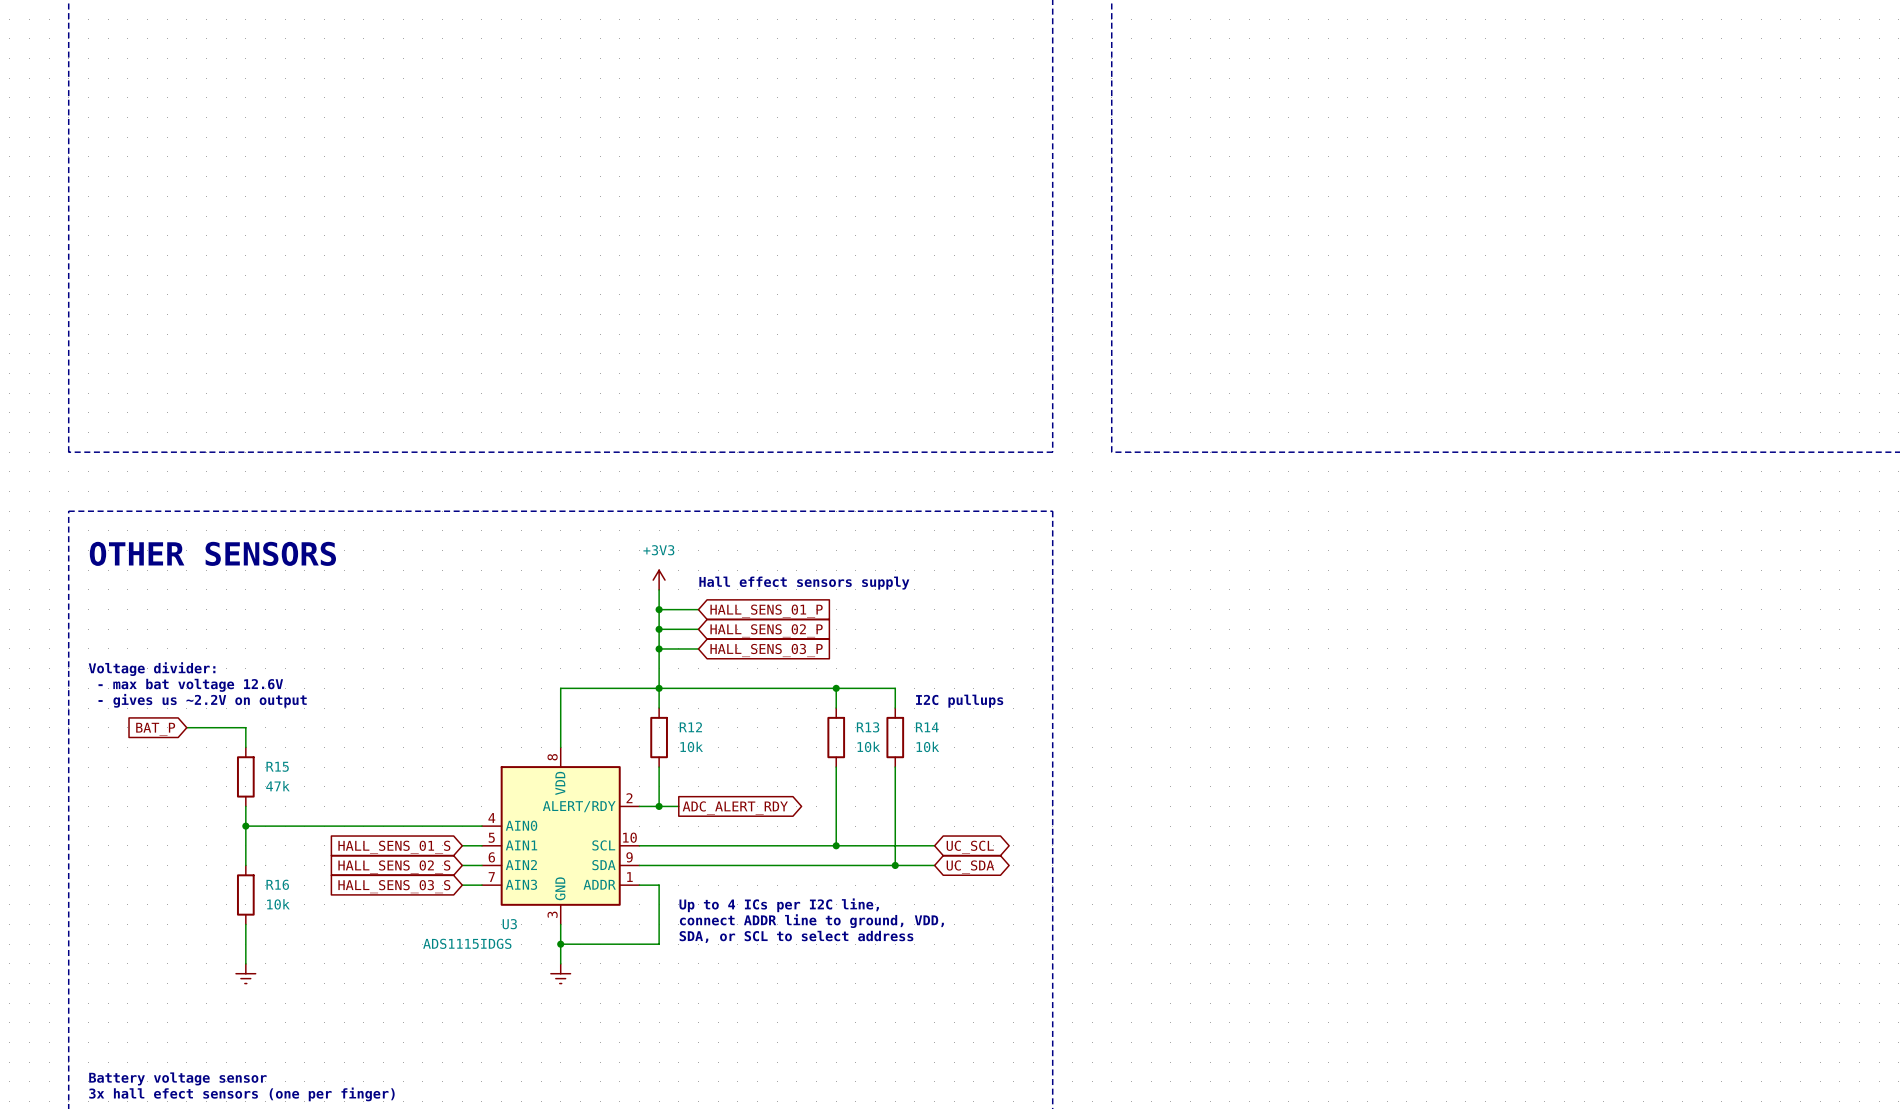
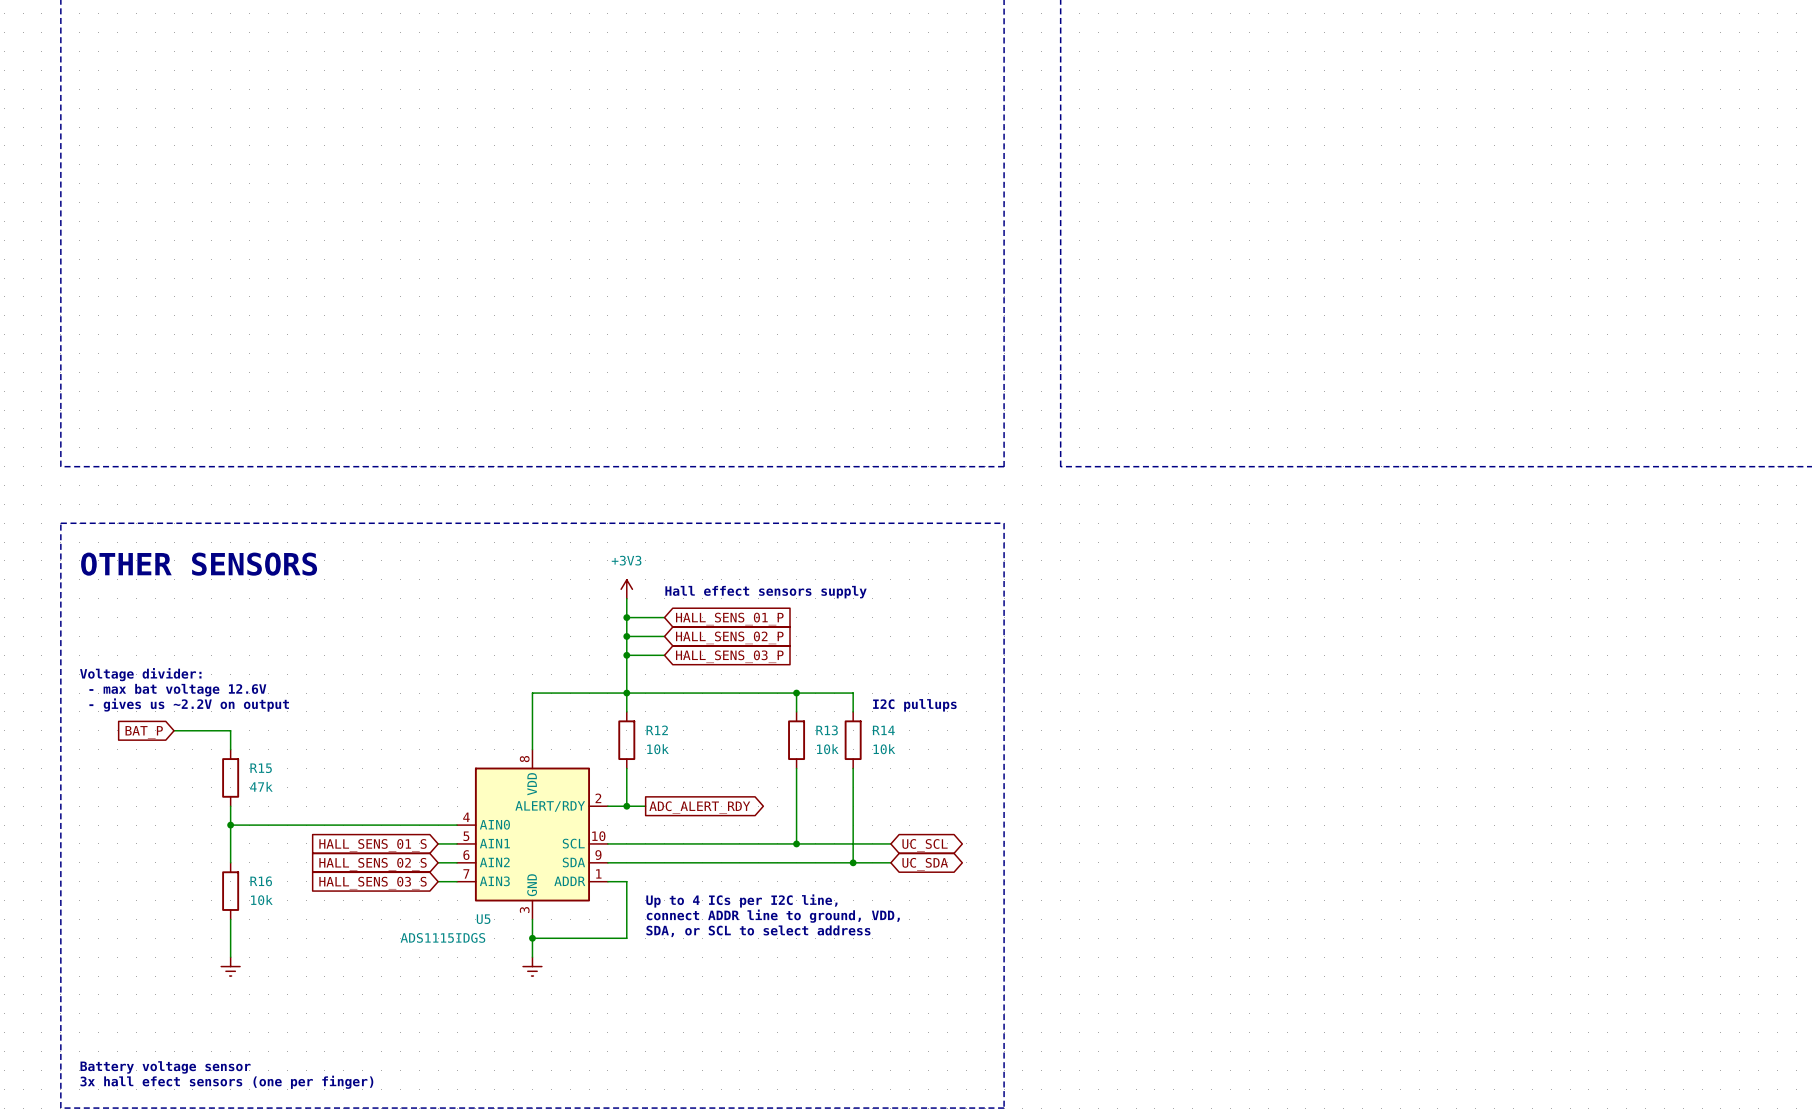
U3 name: U3 (509, 924) -> U5 (483, 919)

